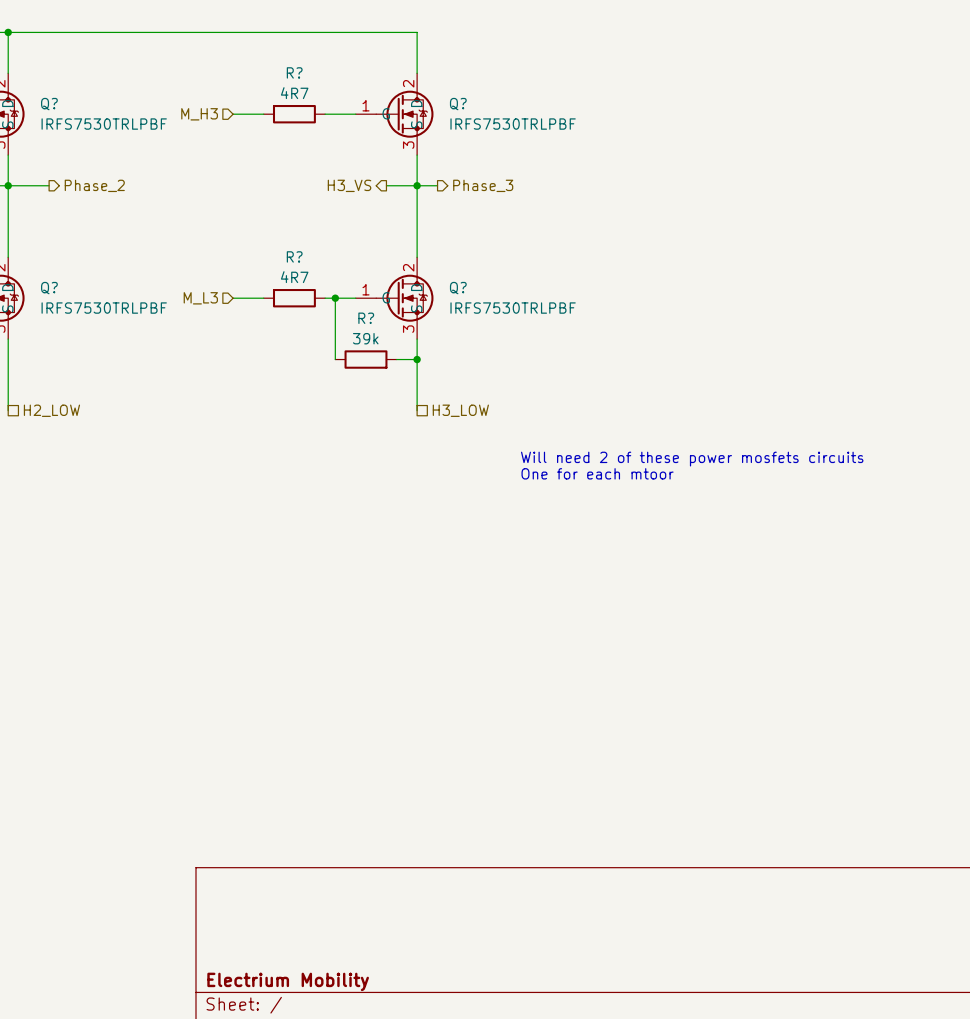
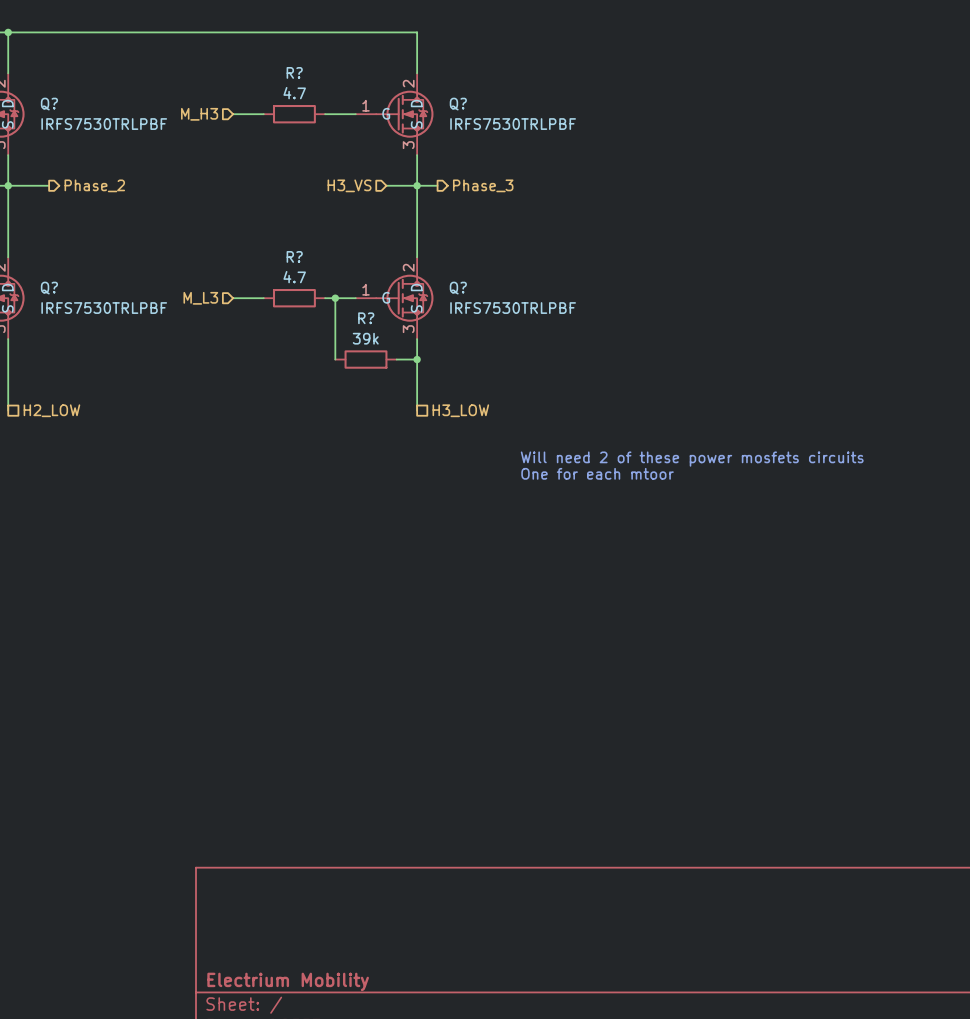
R? value: 4R7 (294, 93) -> 4.7 (294, 93)
hierarchical label shape: output (349, 185) -> input (349, 185)
R? value: 4R7 (294, 277) -> 4.7 (294, 277)

